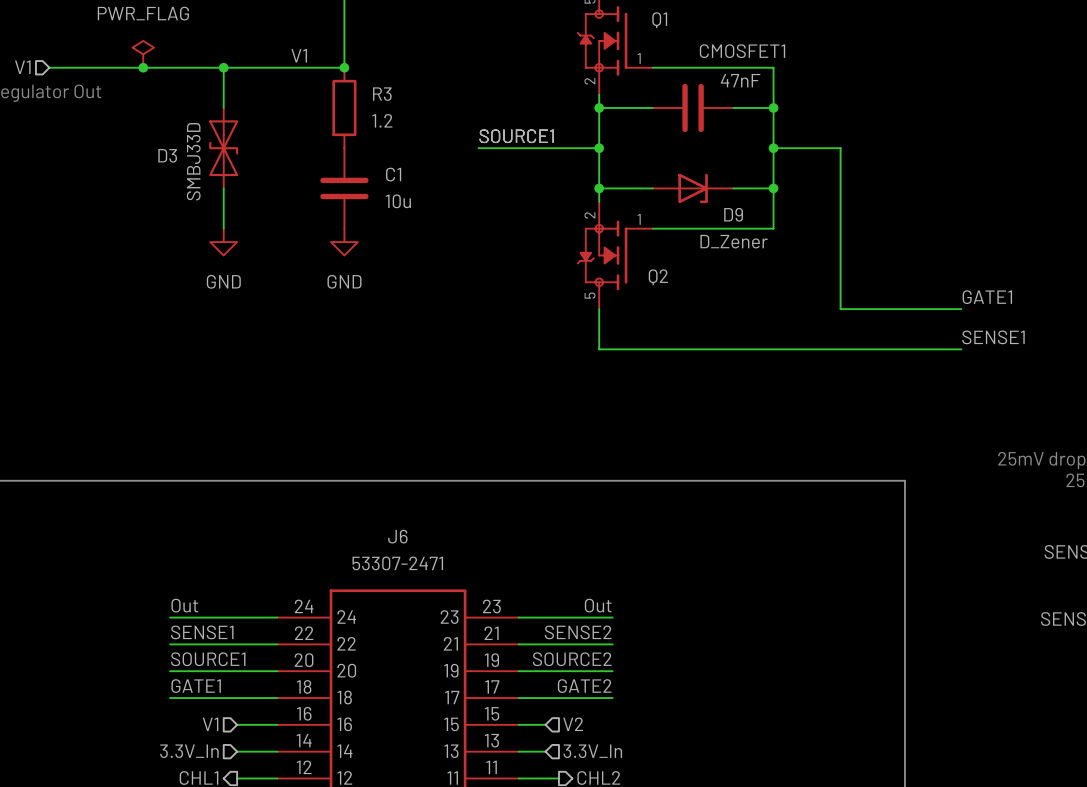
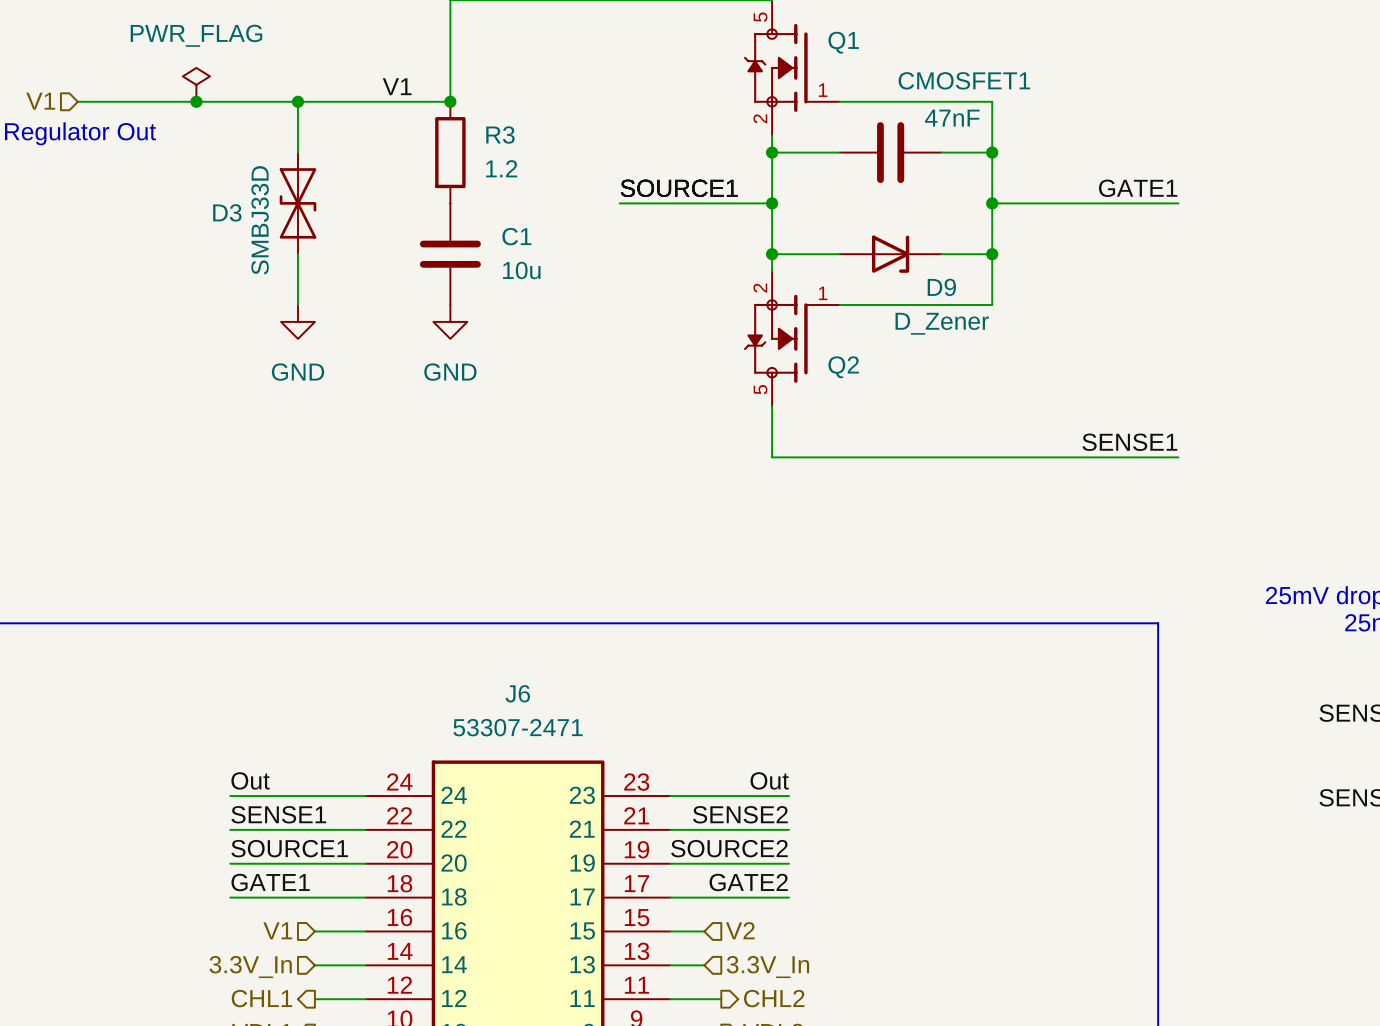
wire: (840, 148) (840, 309) (961, 309) -> (1076, 203) (1178, 203)
label position: GATE1 (987, 297) -> GATE1 (1138, 188)
label position: SENSE1 (993, 337) -> SENSE1 (1129, 442)
wire: (921, 349) (961, 349) -> none

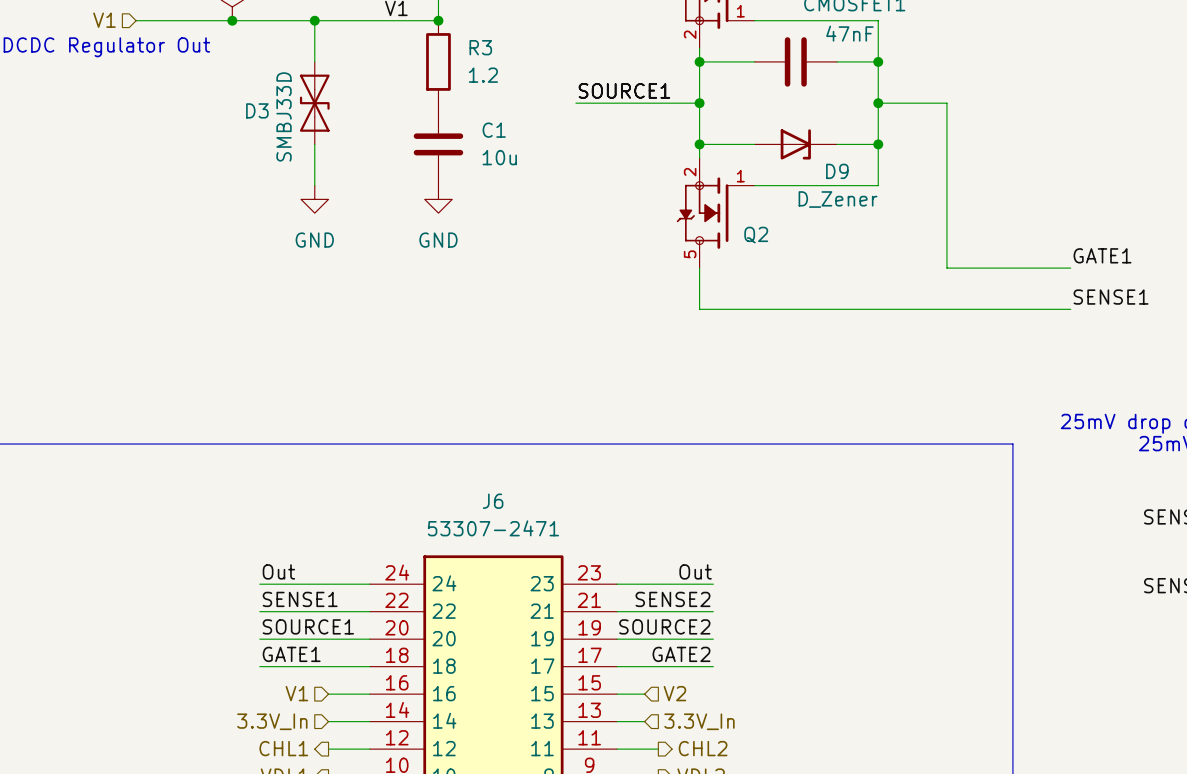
label position: GATE1 (1138, 188) -> GATE1 (1102, 255)
wire: (1076, 203) (1178, 203) -> (946, 103) (946, 268) (1070, 268)
label position: SENSE1 (1129, 442) -> SENSE1 (1111, 297)
wire: none -> (1029, 309) (1070, 309)

